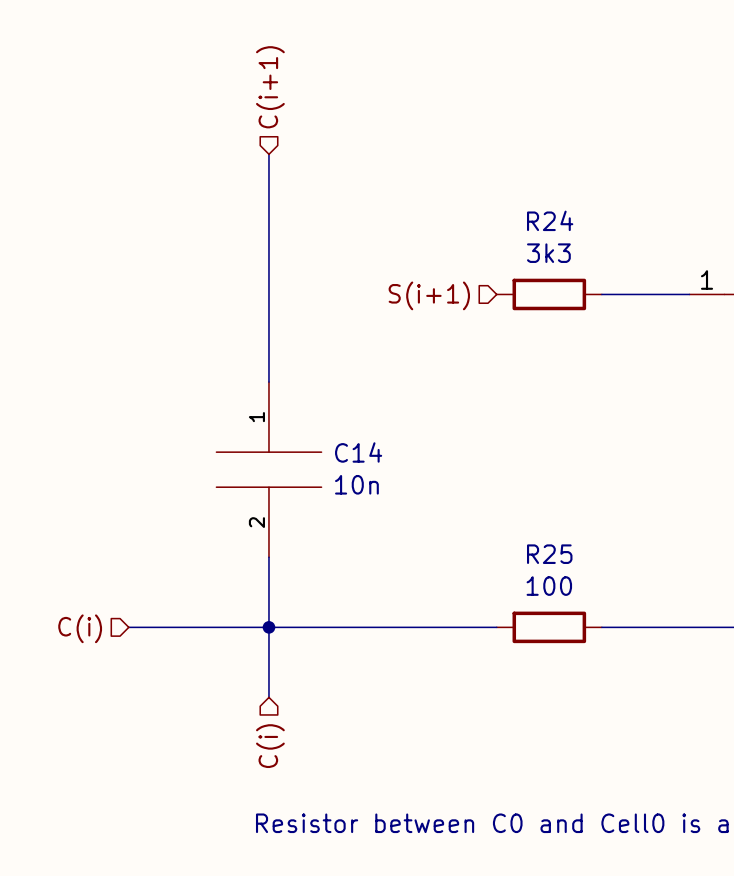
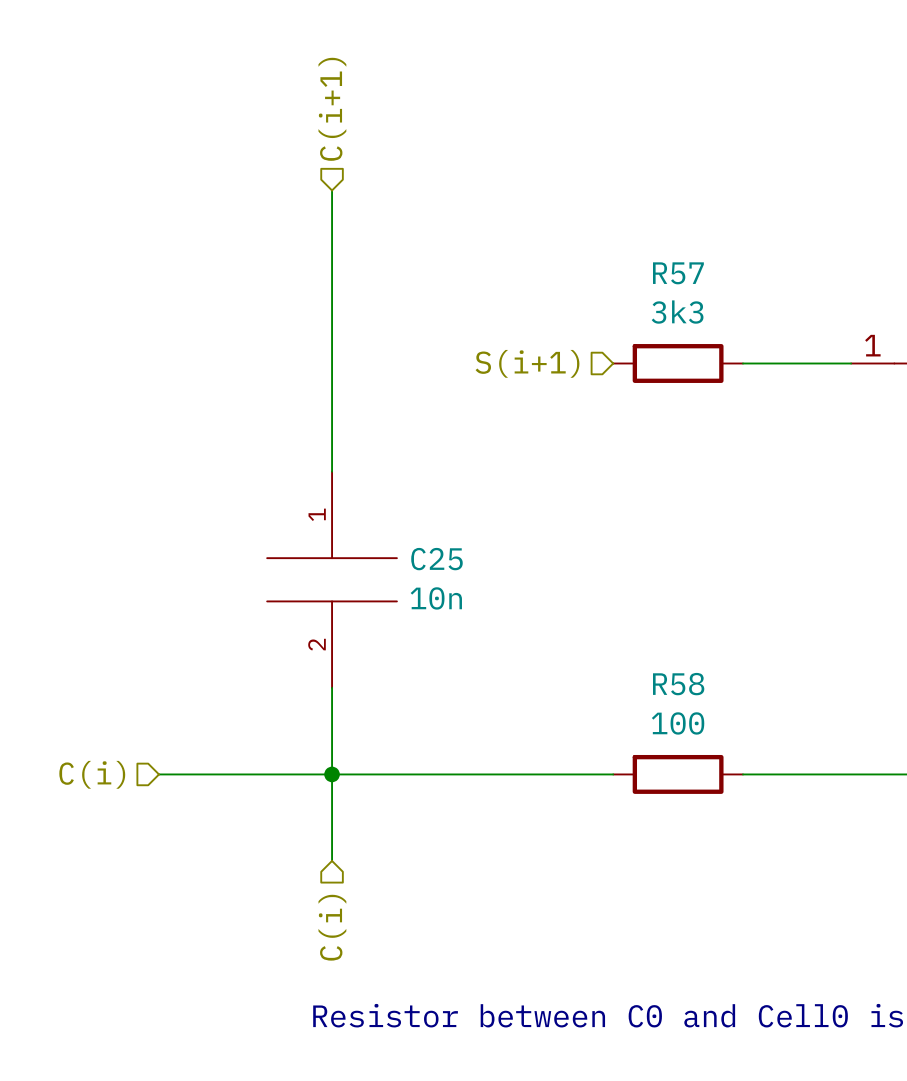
R24 name: R24 (550, 220) -> R57 (678, 273)
C14 name: C14 (358, 452) -> C25 (436, 559)
R25 name: R25 (549, 554) -> R58 (678, 684)

